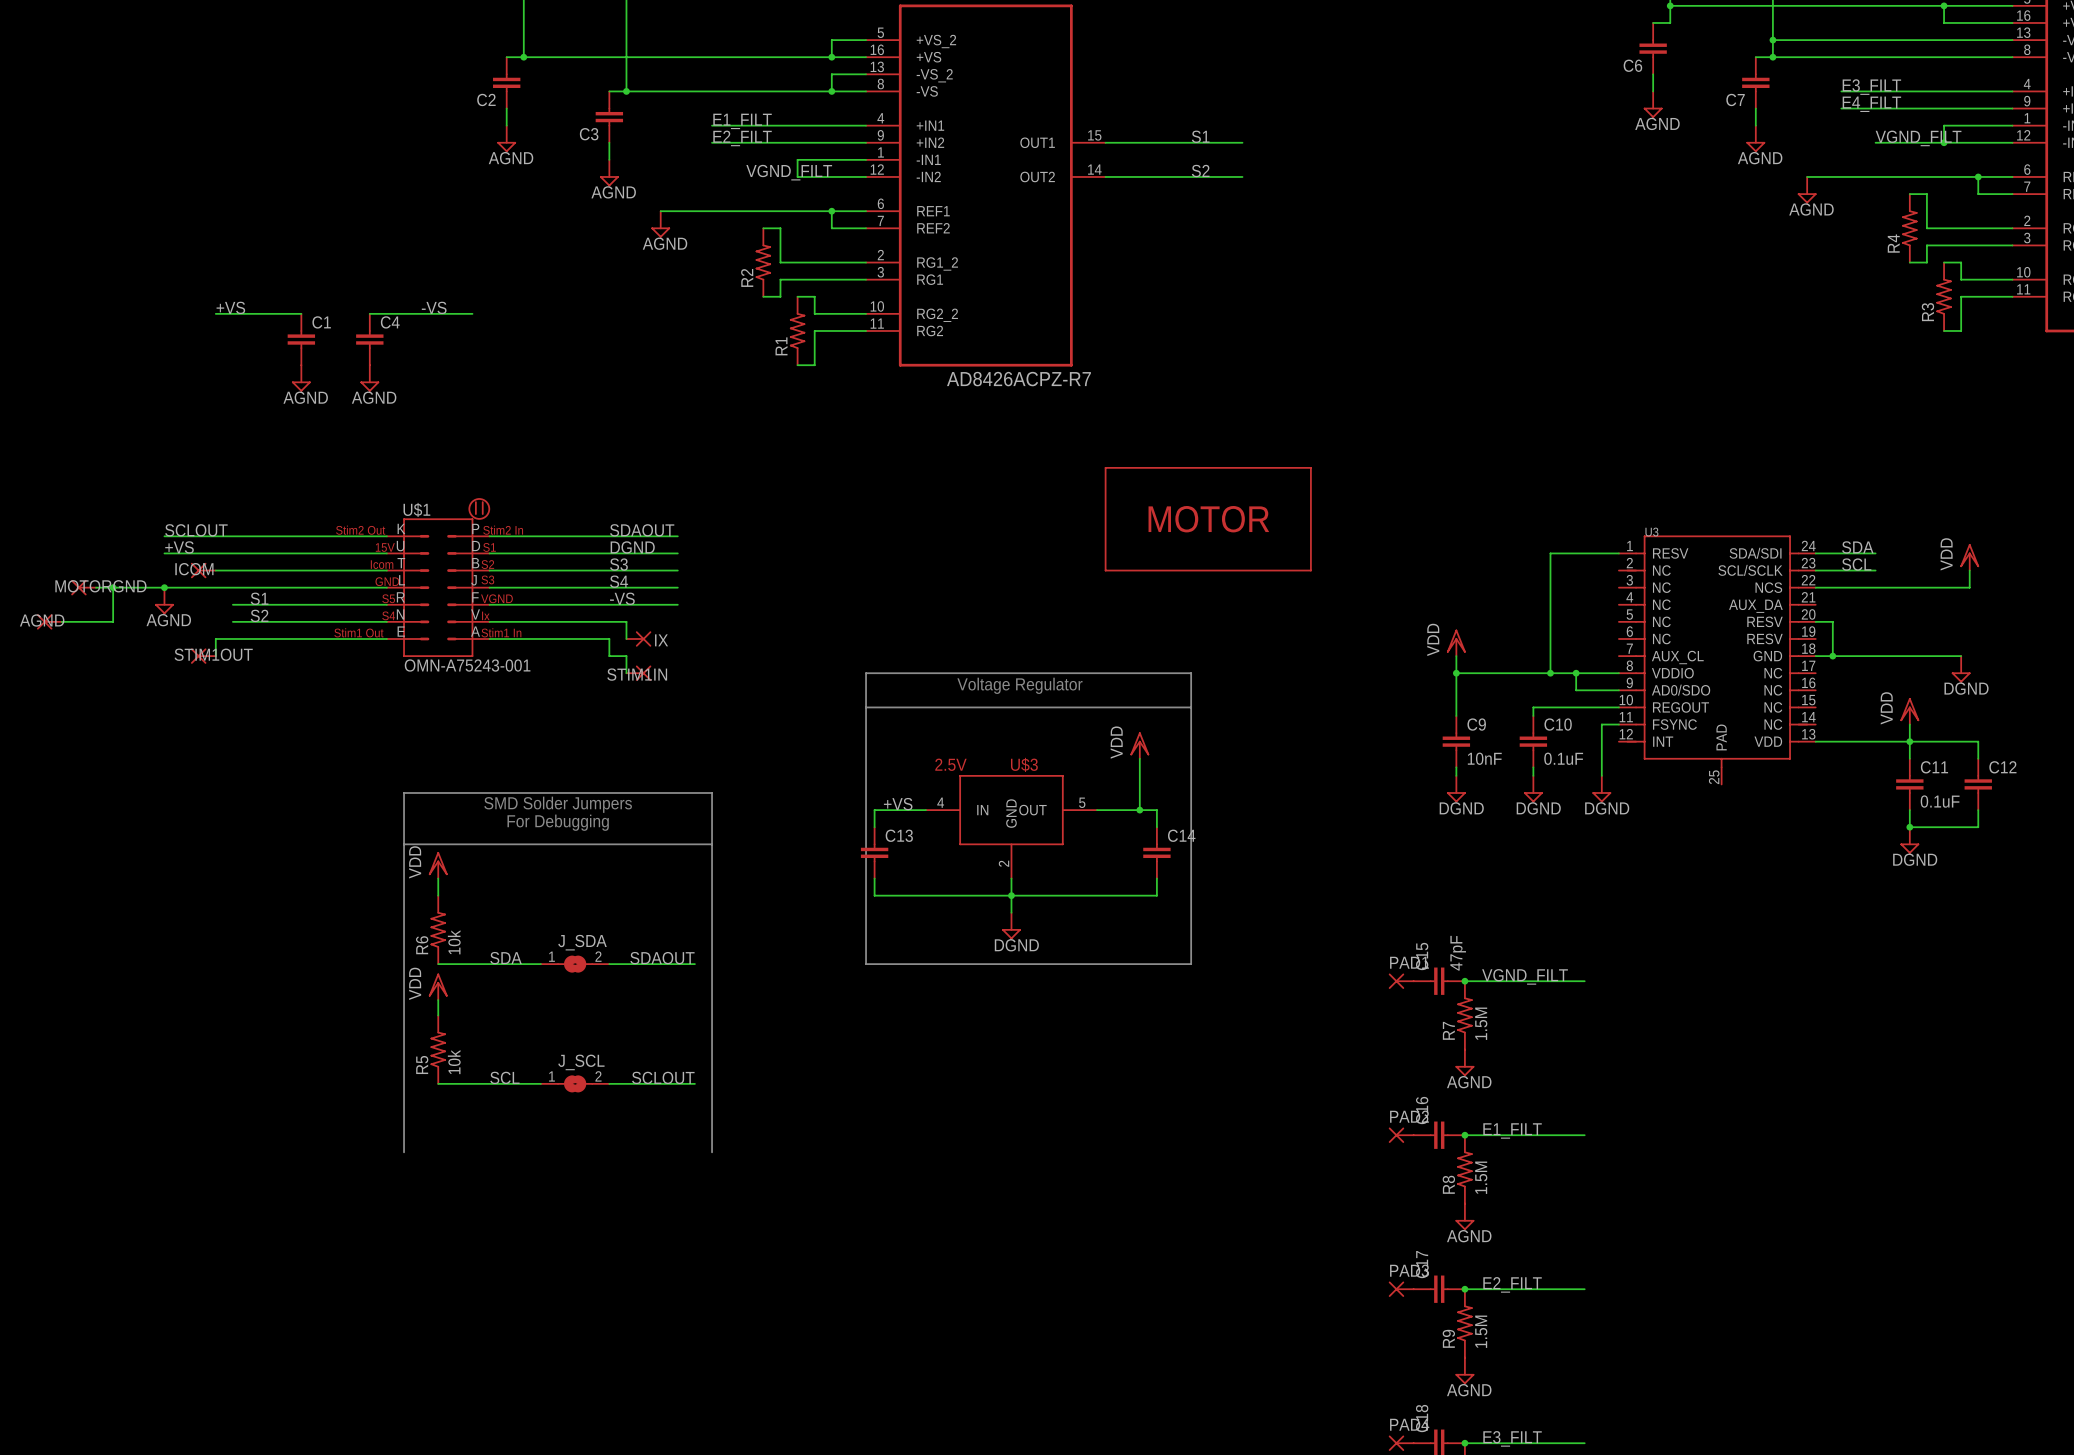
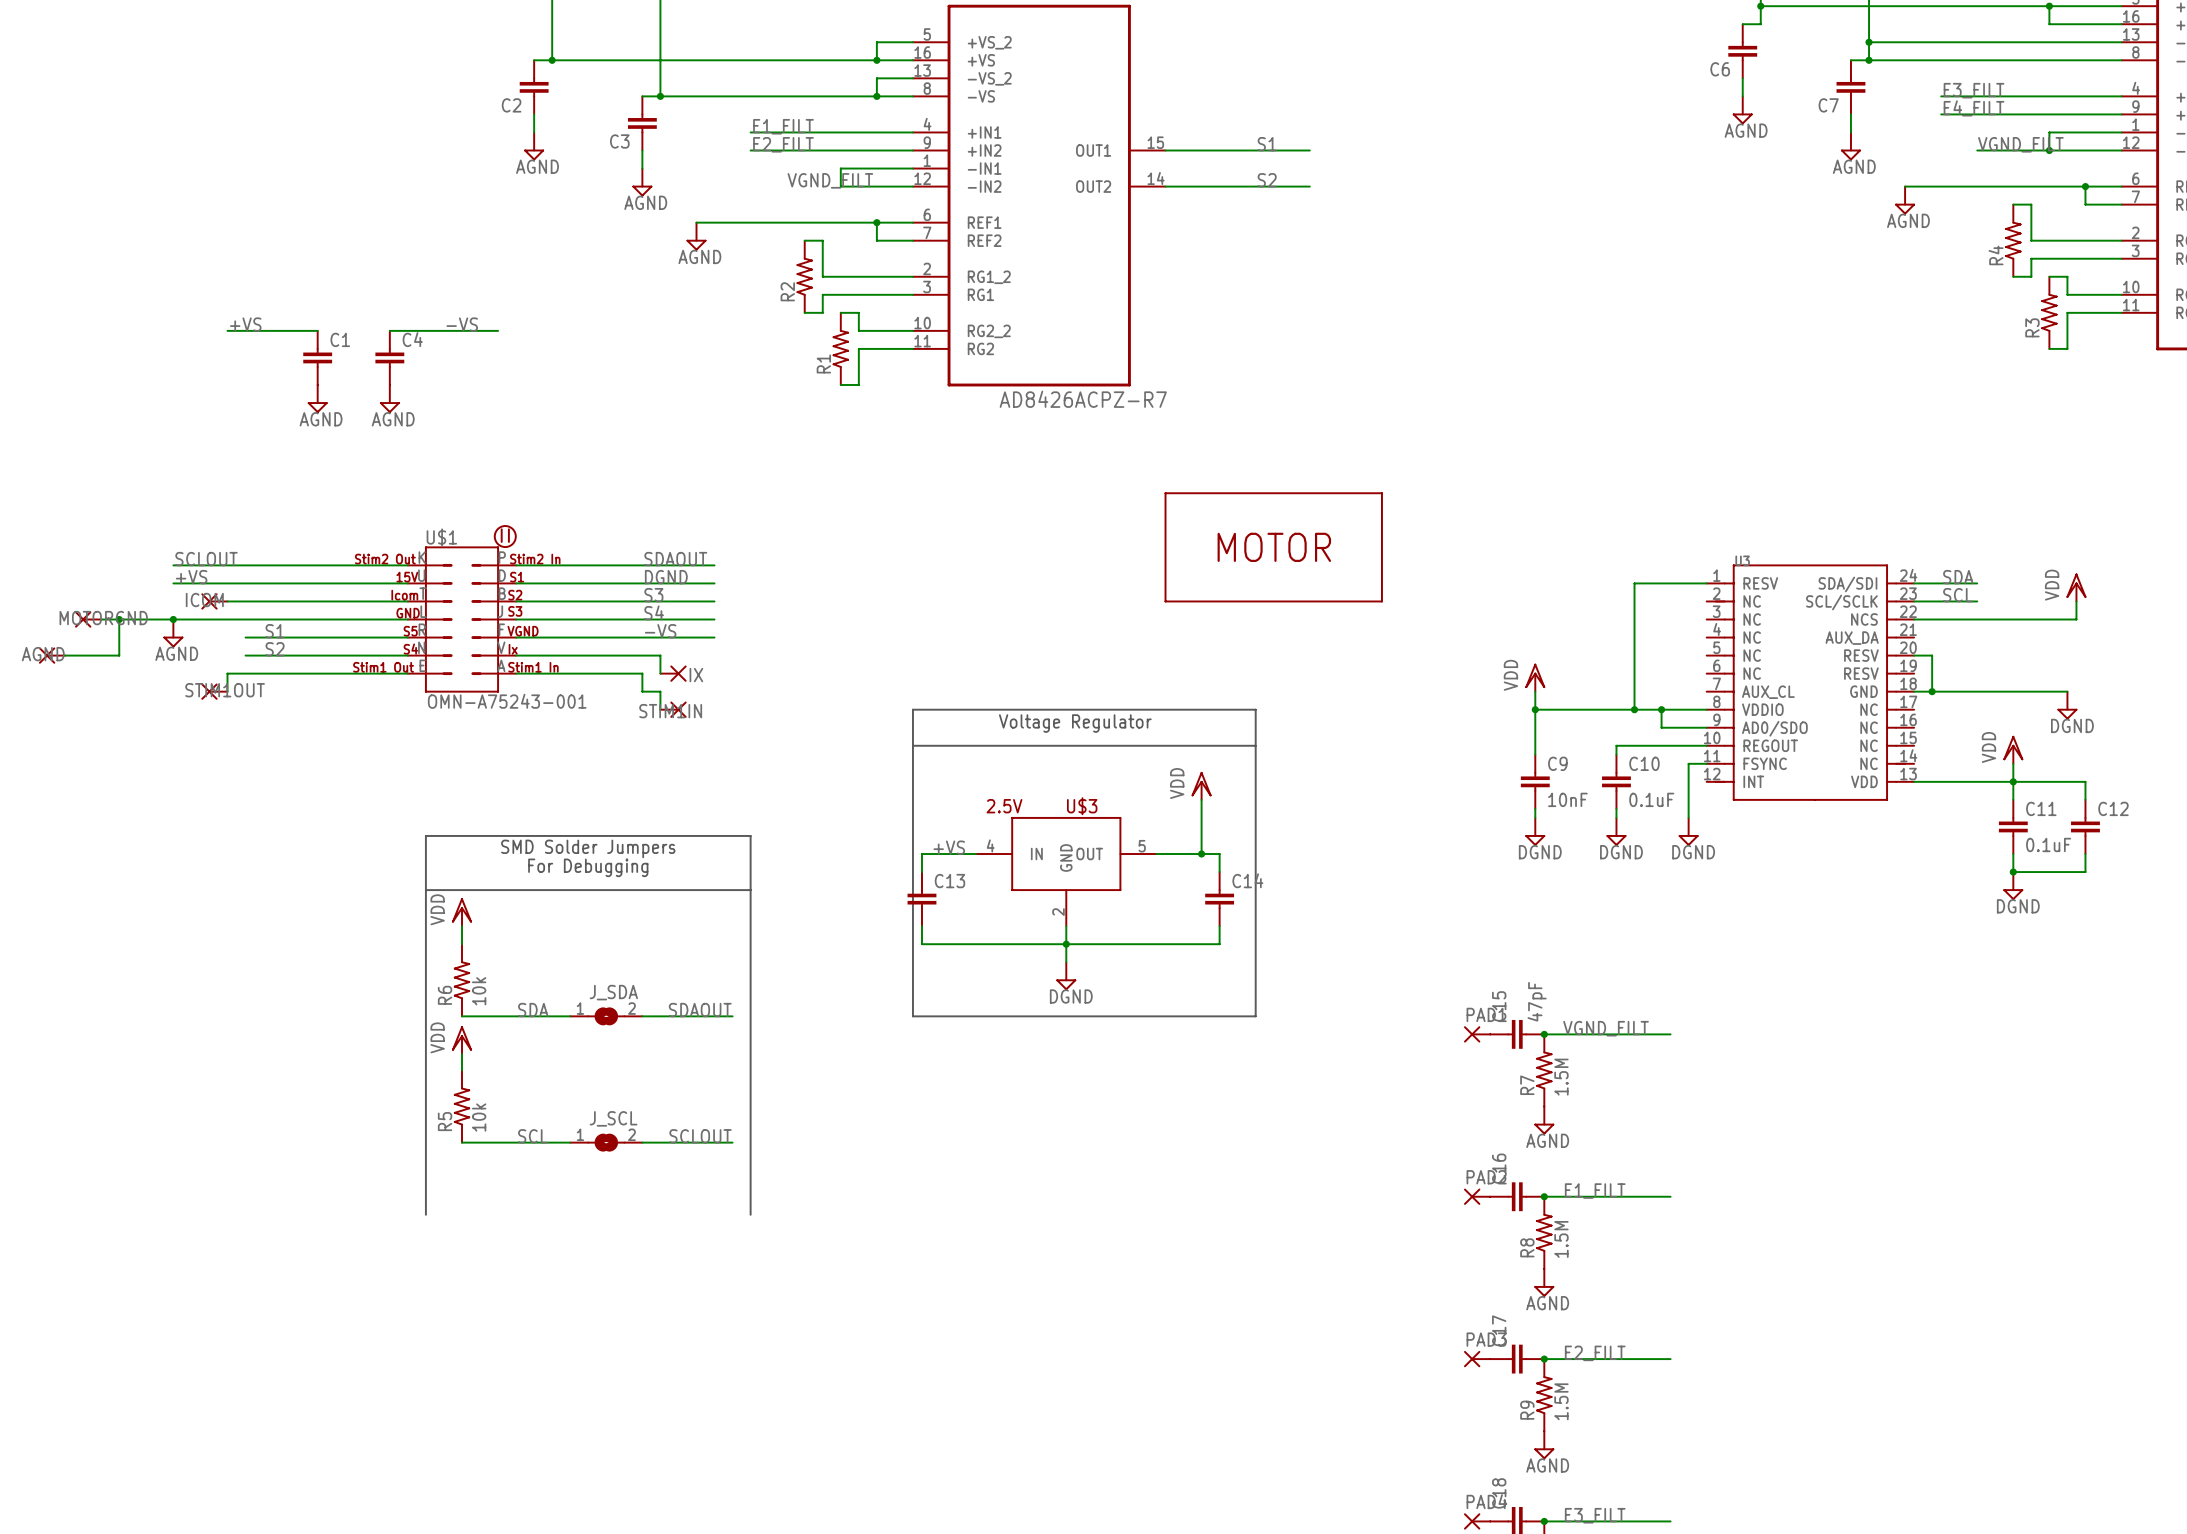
U3 symbol: [1618, 535, 1816, 785] -> [1706, 564, 1915, 801]

